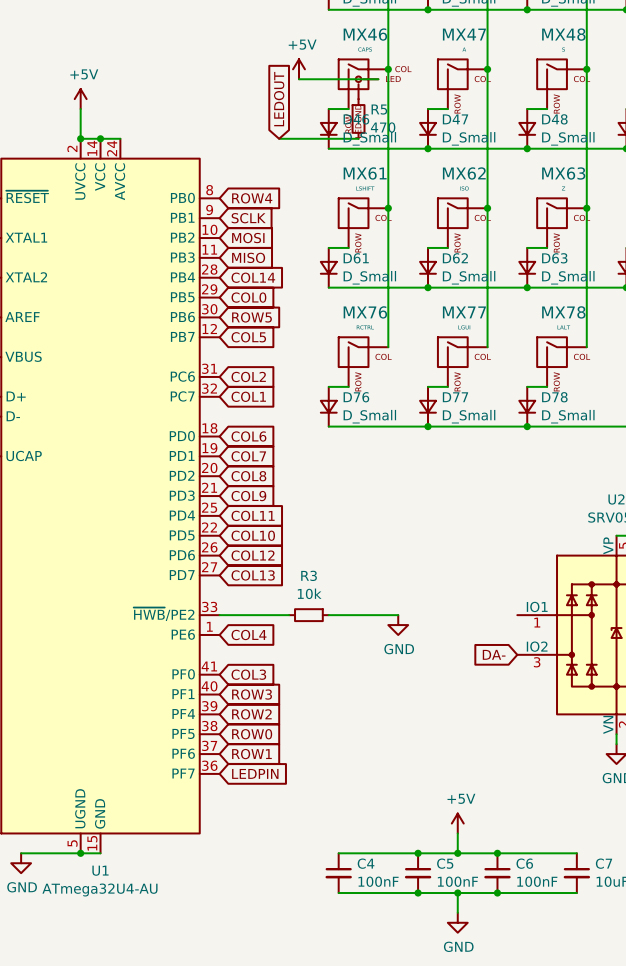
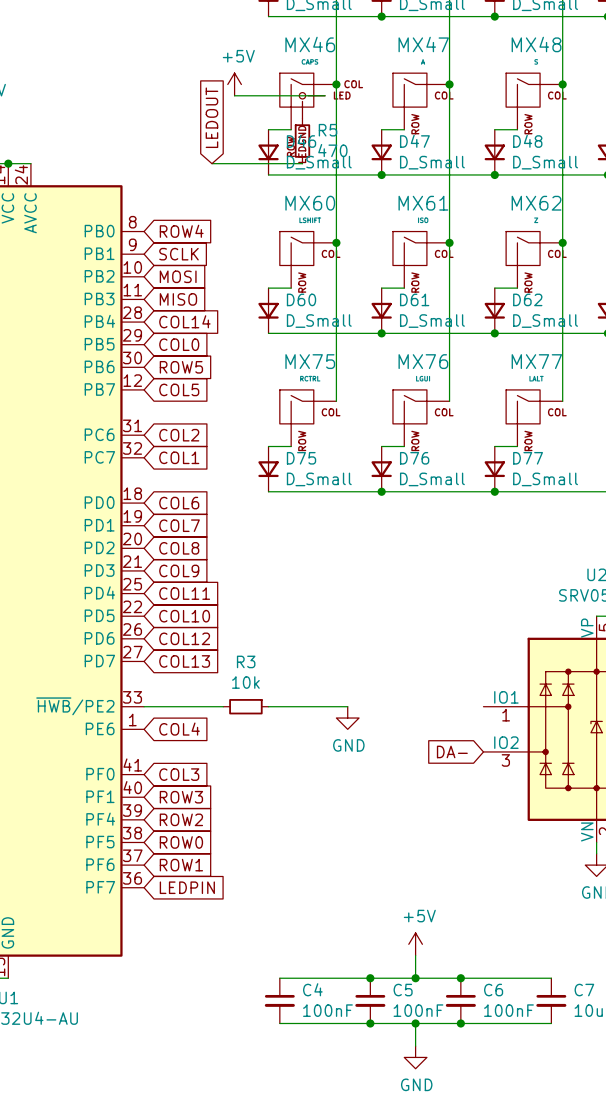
MX61 name: MX61 (365, 173) -> MX60 (310, 203)
MX62 name: MX62 (464, 173) -> MX61 (423, 203)
MX63 name: MX63 (563, 173) -> MX62 (536, 203)
D61 name: D61 (356, 258) -> D60 (301, 299)
D62 name: D62 (455, 258) -> D61 (414, 299)
D63 name: D63 (554, 258) -> D62 (527, 299)
MX76 name: MX76 (365, 312) -> MX75 (310, 361)
MX77 name: MX77 (464, 312) -> MX76 (423, 361)
MX78 name: MX78 (563, 312) -> MX77 (536, 361)
D76 name: D76 (356, 397) -> D75 (301, 458)
D77 name: D77 (455, 397) -> D76 (414, 458)
D78 name: D78 (554, 397) -> D77 (528, 458)

